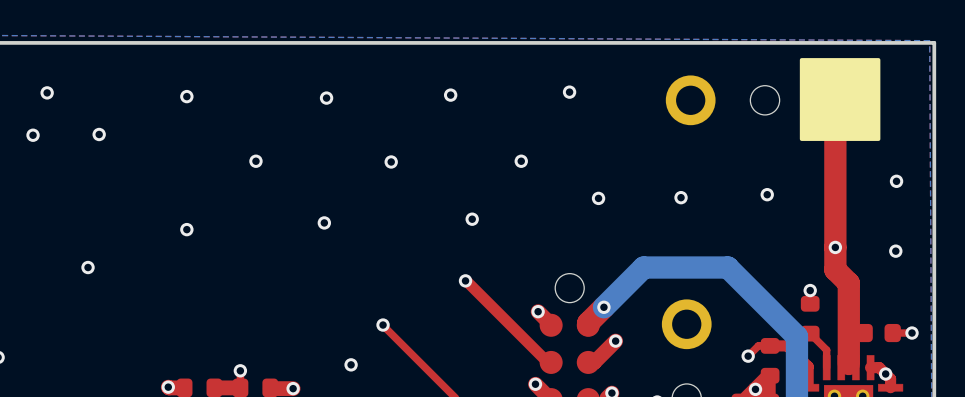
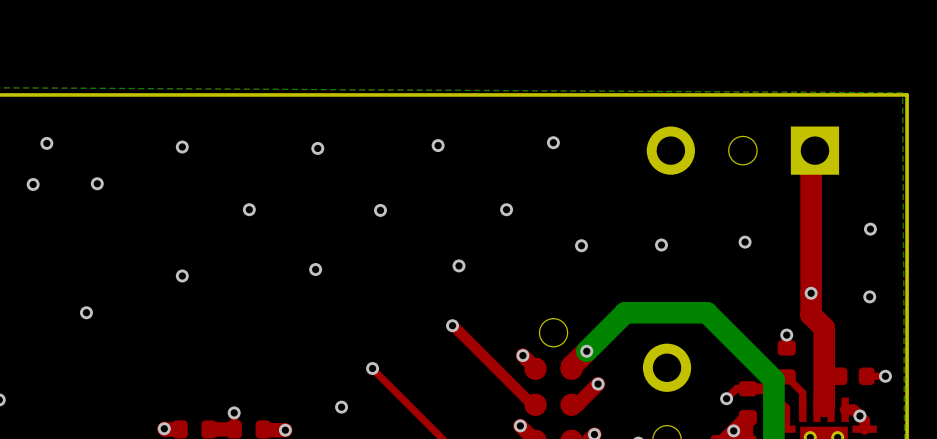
drawing: [799, 58, 881, 141] -> none

